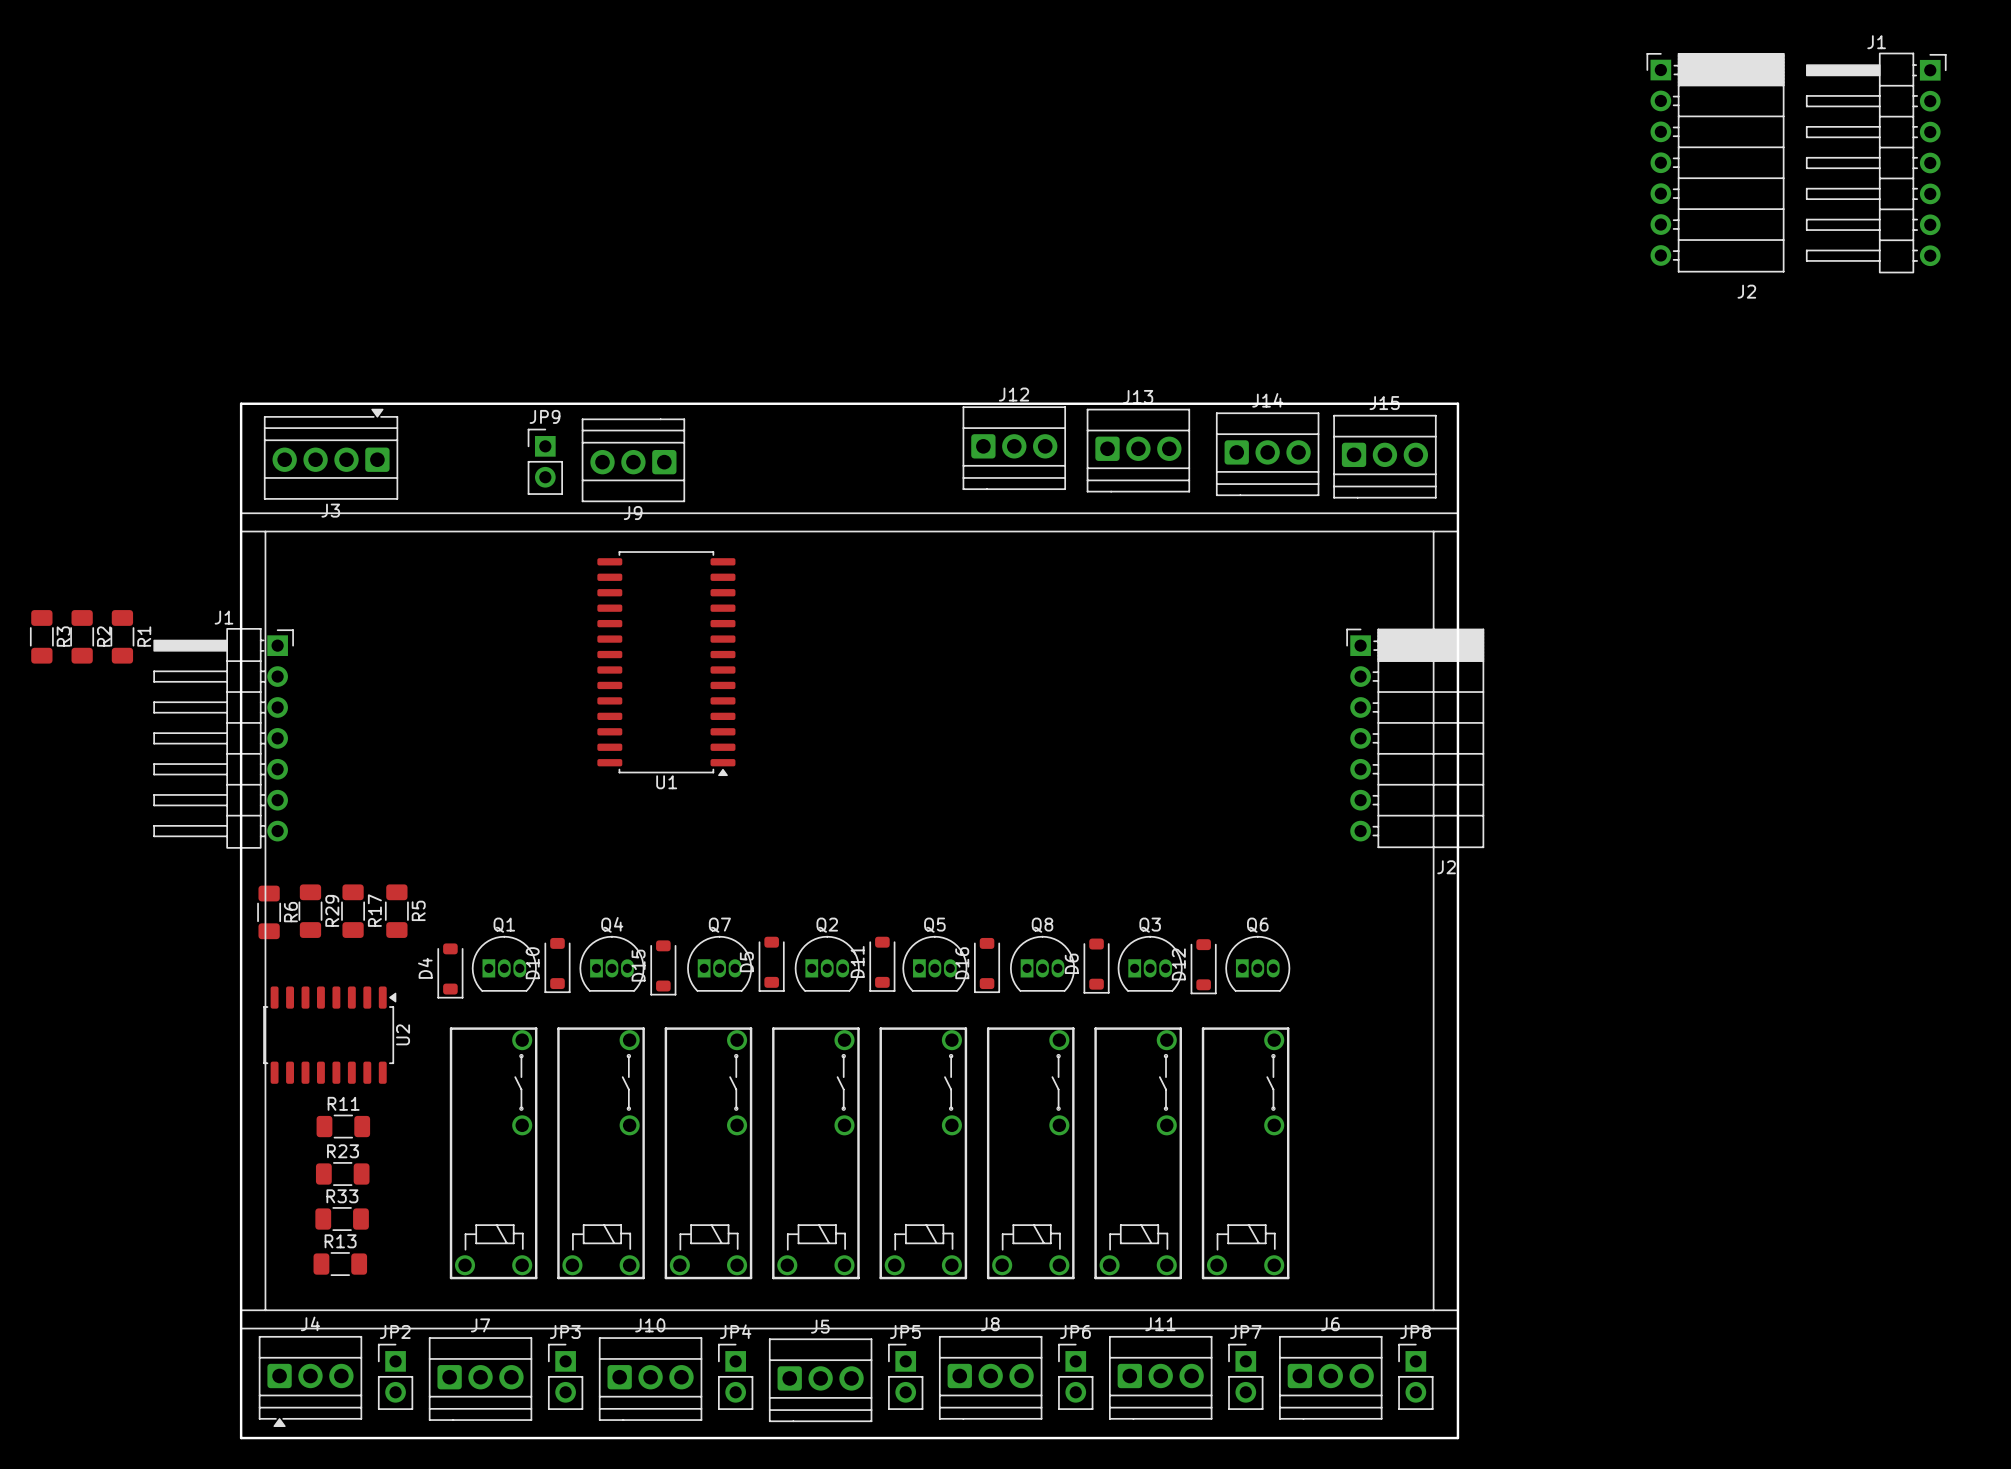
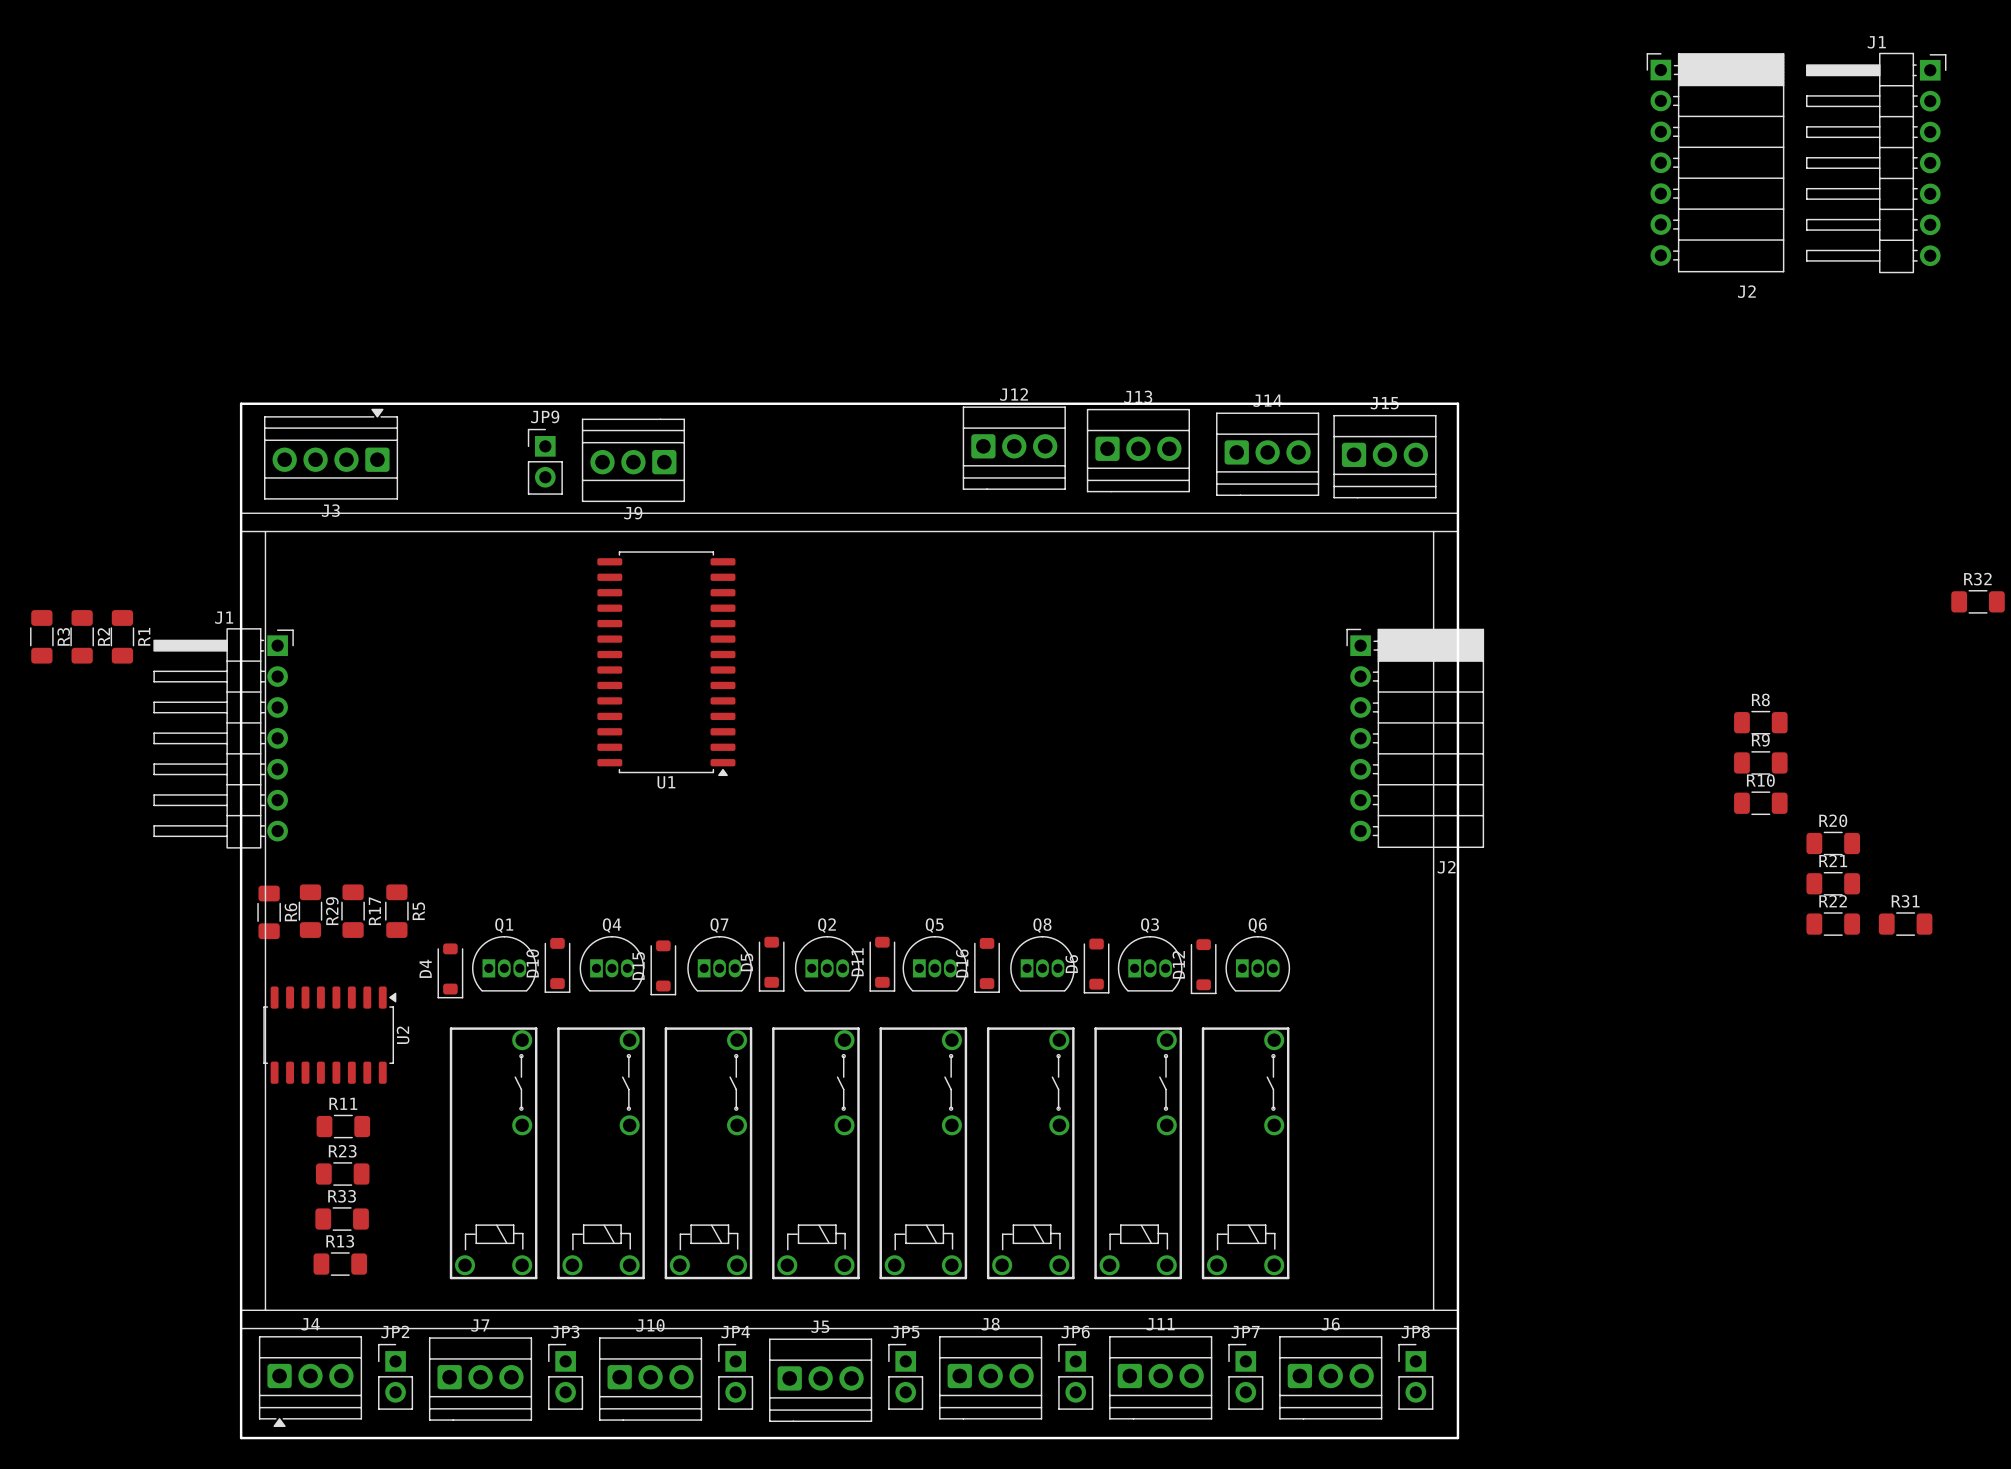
R32: none -> (1978, 601)
R8: none -> (1760, 722)
R9: none -> (1760, 762)
R10: none -> (1760, 803)
R20: none -> (1833, 843)
R21: none -> (1833, 883)
R22: none -> (1833, 924)
R31: none -> (1905, 924)

